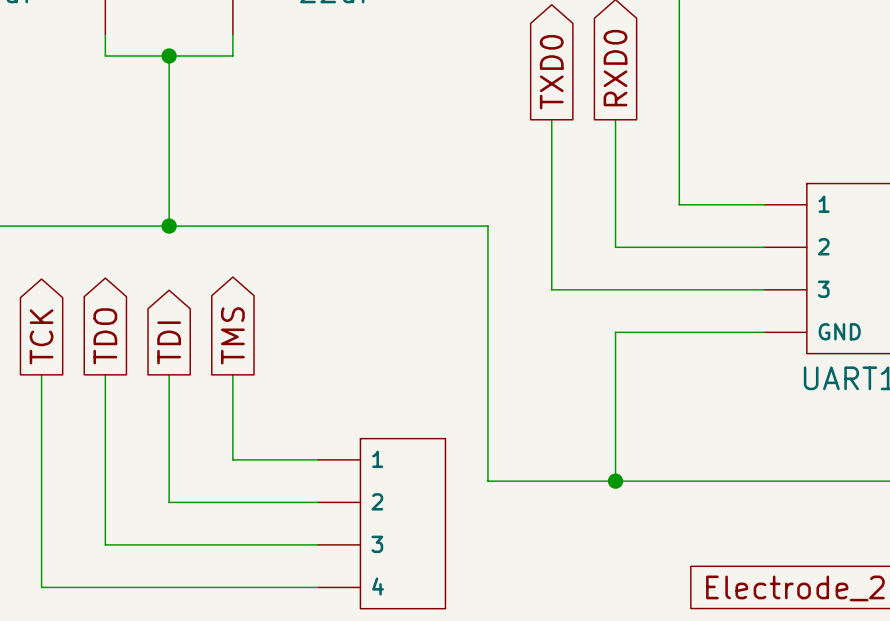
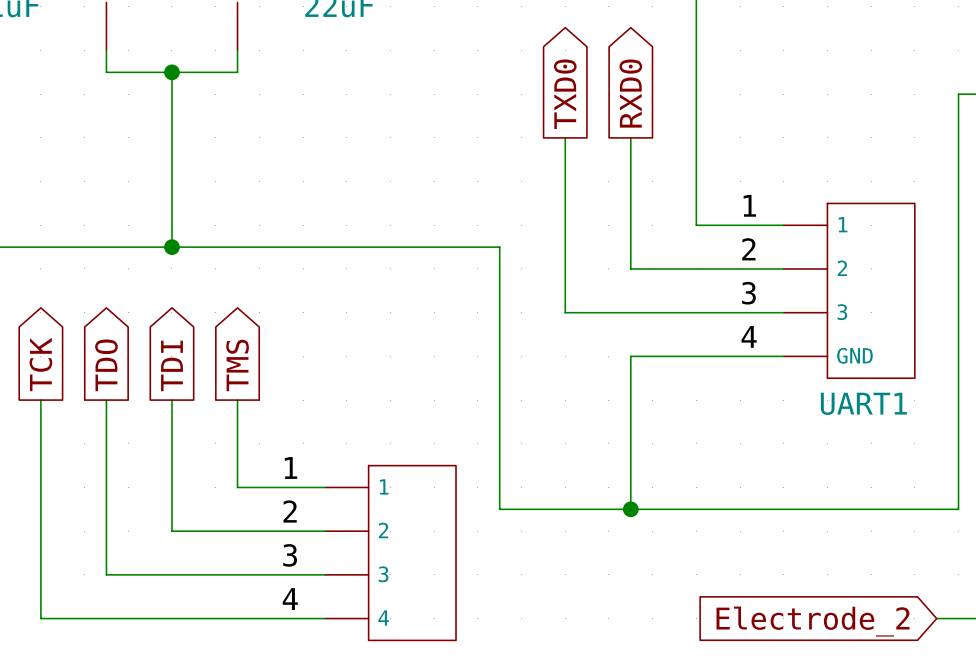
label: none -> 1 (749, 205)
label: none -> 2 (748, 249)
label: none -> 3 (748, 293)
label: none -> 4 (749, 336)
label: none -> 1 (291, 467)
label: none -> 2 (290, 511)
label: none -> 3 (290, 555)
label: none -> 4 (290, 599)

